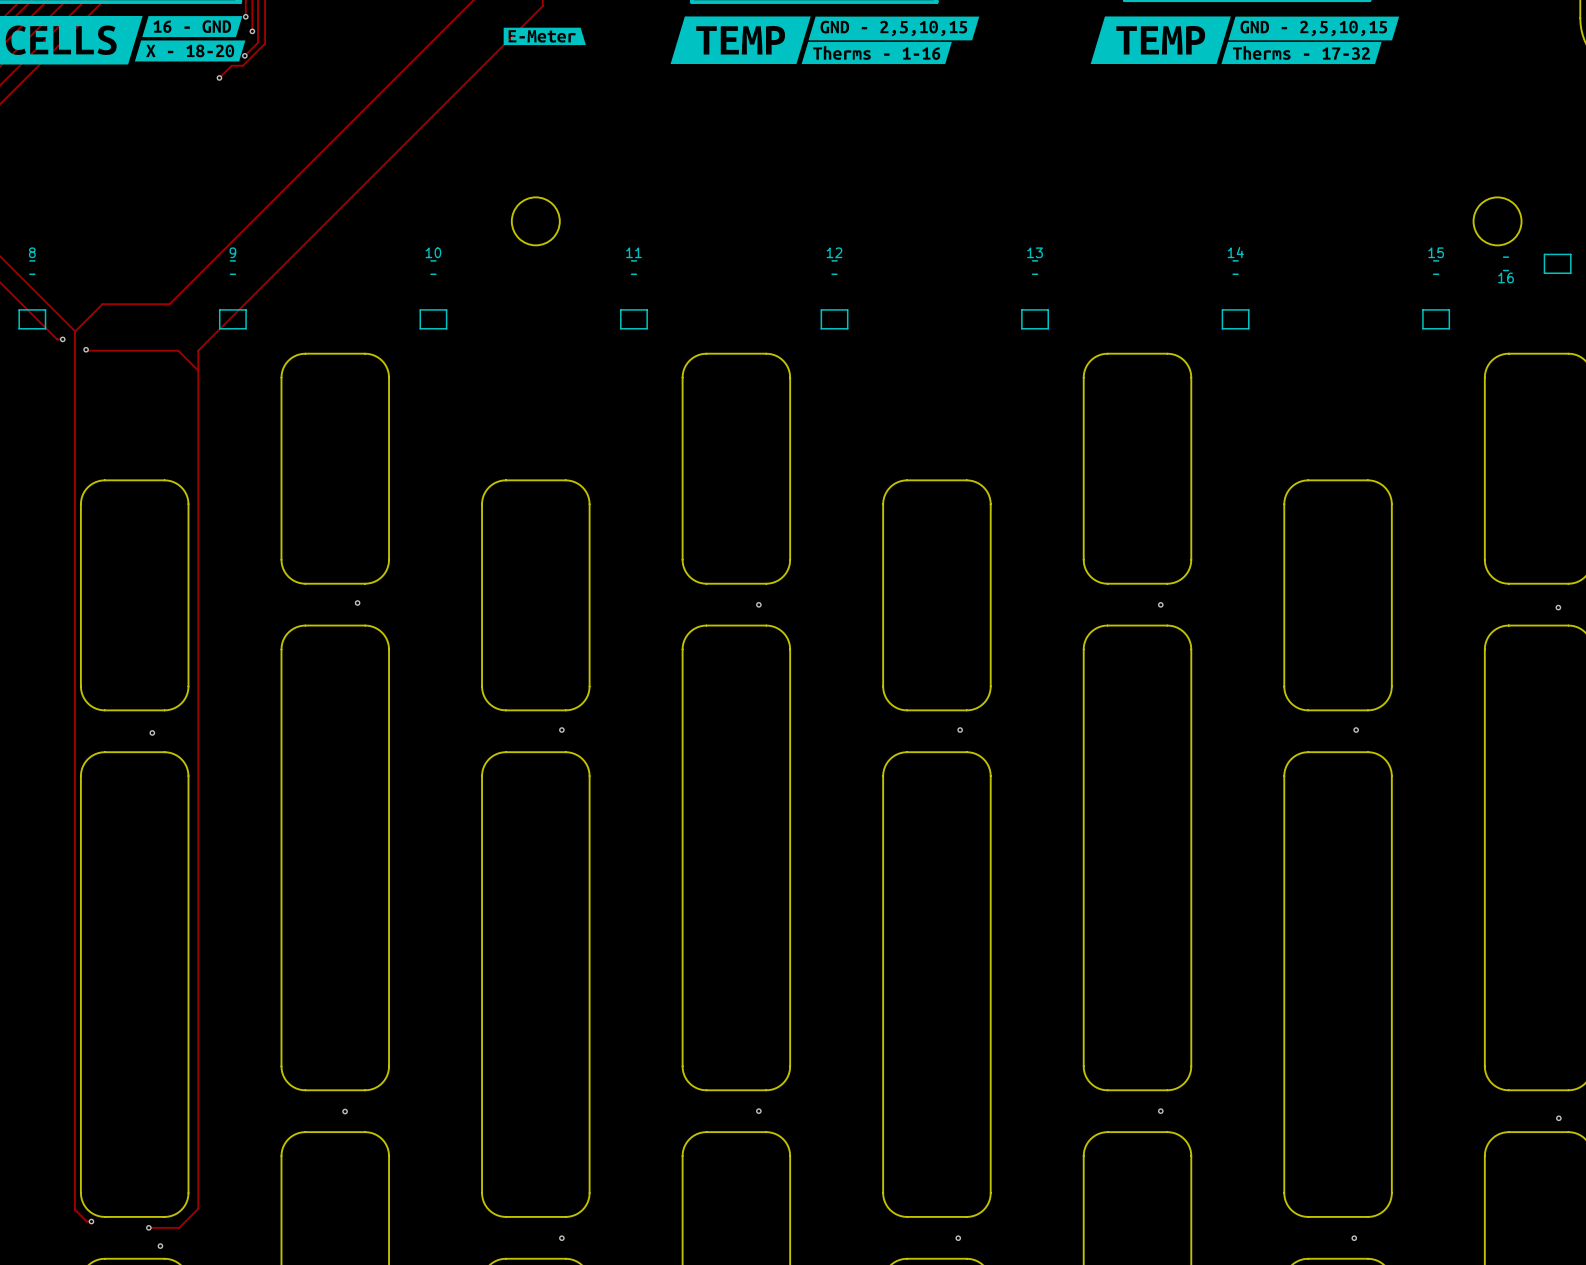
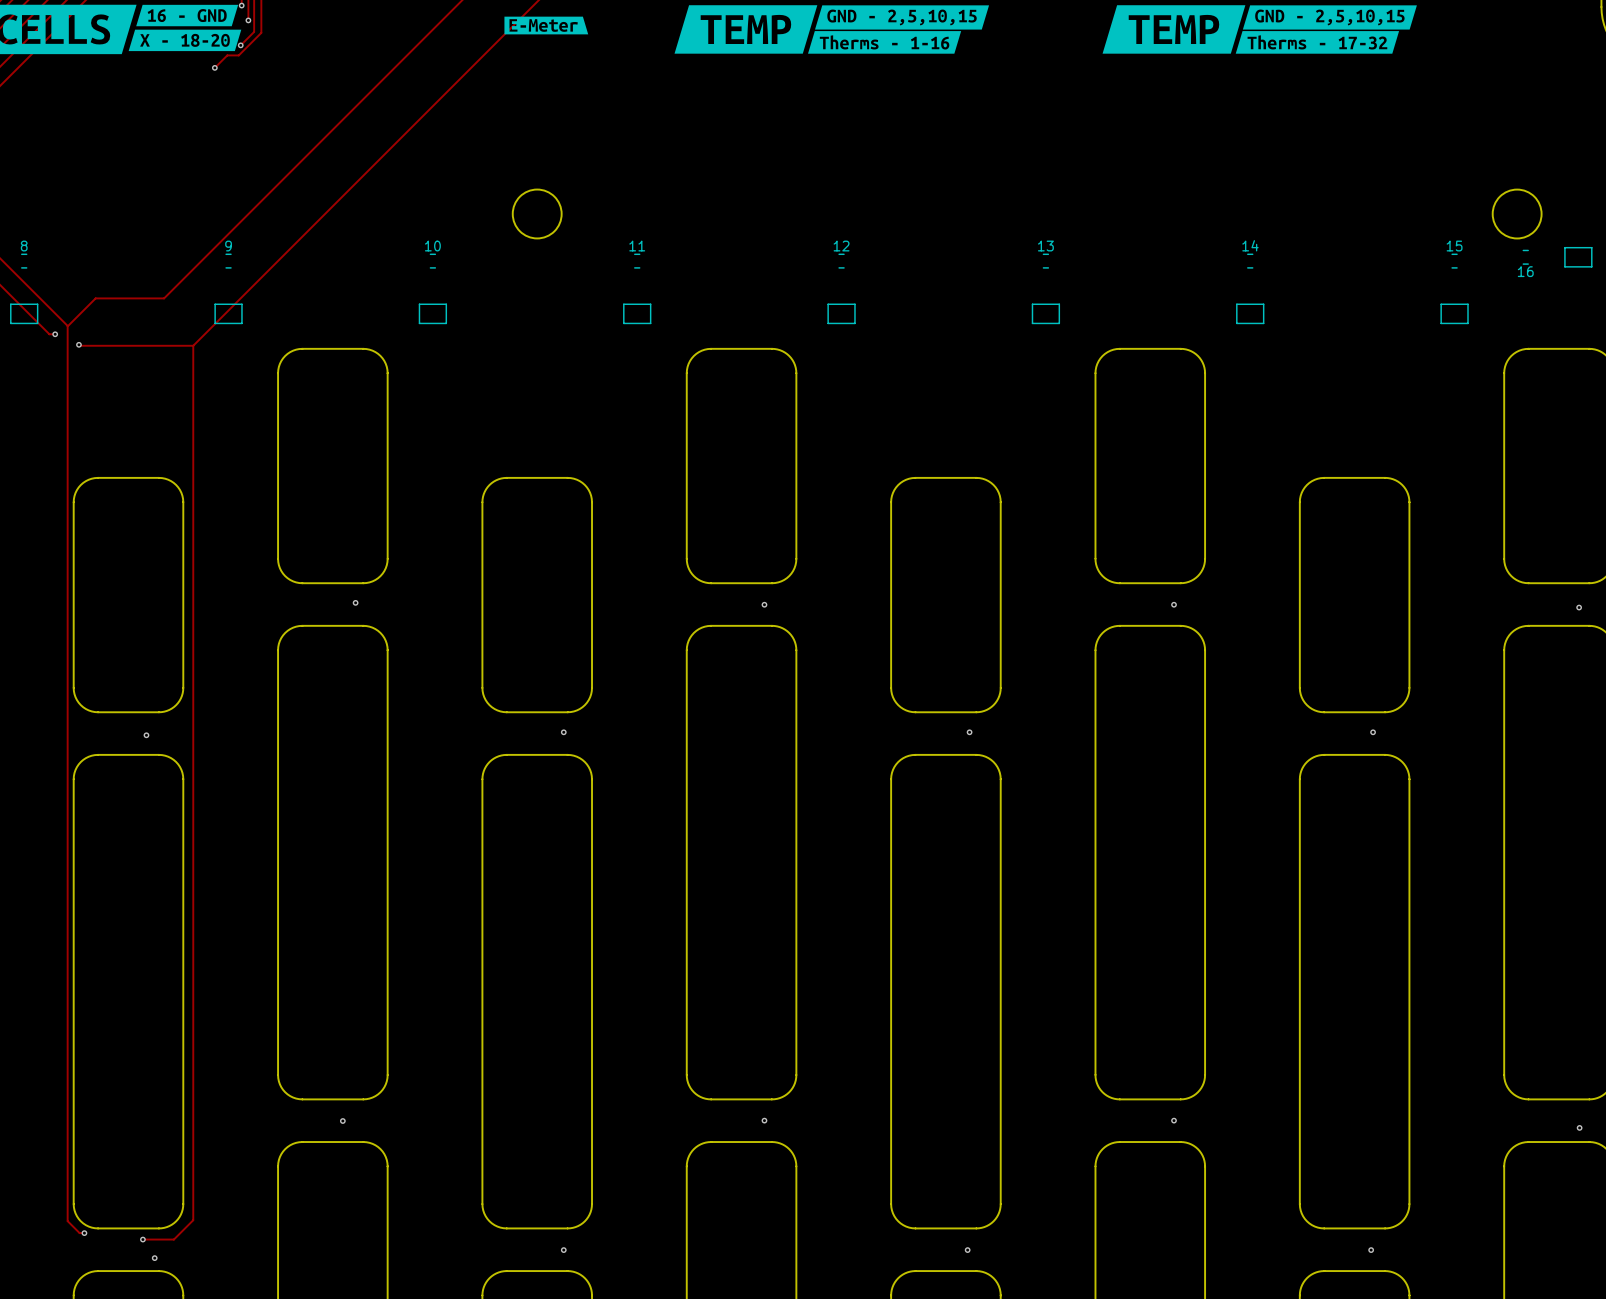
track: (178, 350) (198, 370) -> (172, 345) (193, 345)

